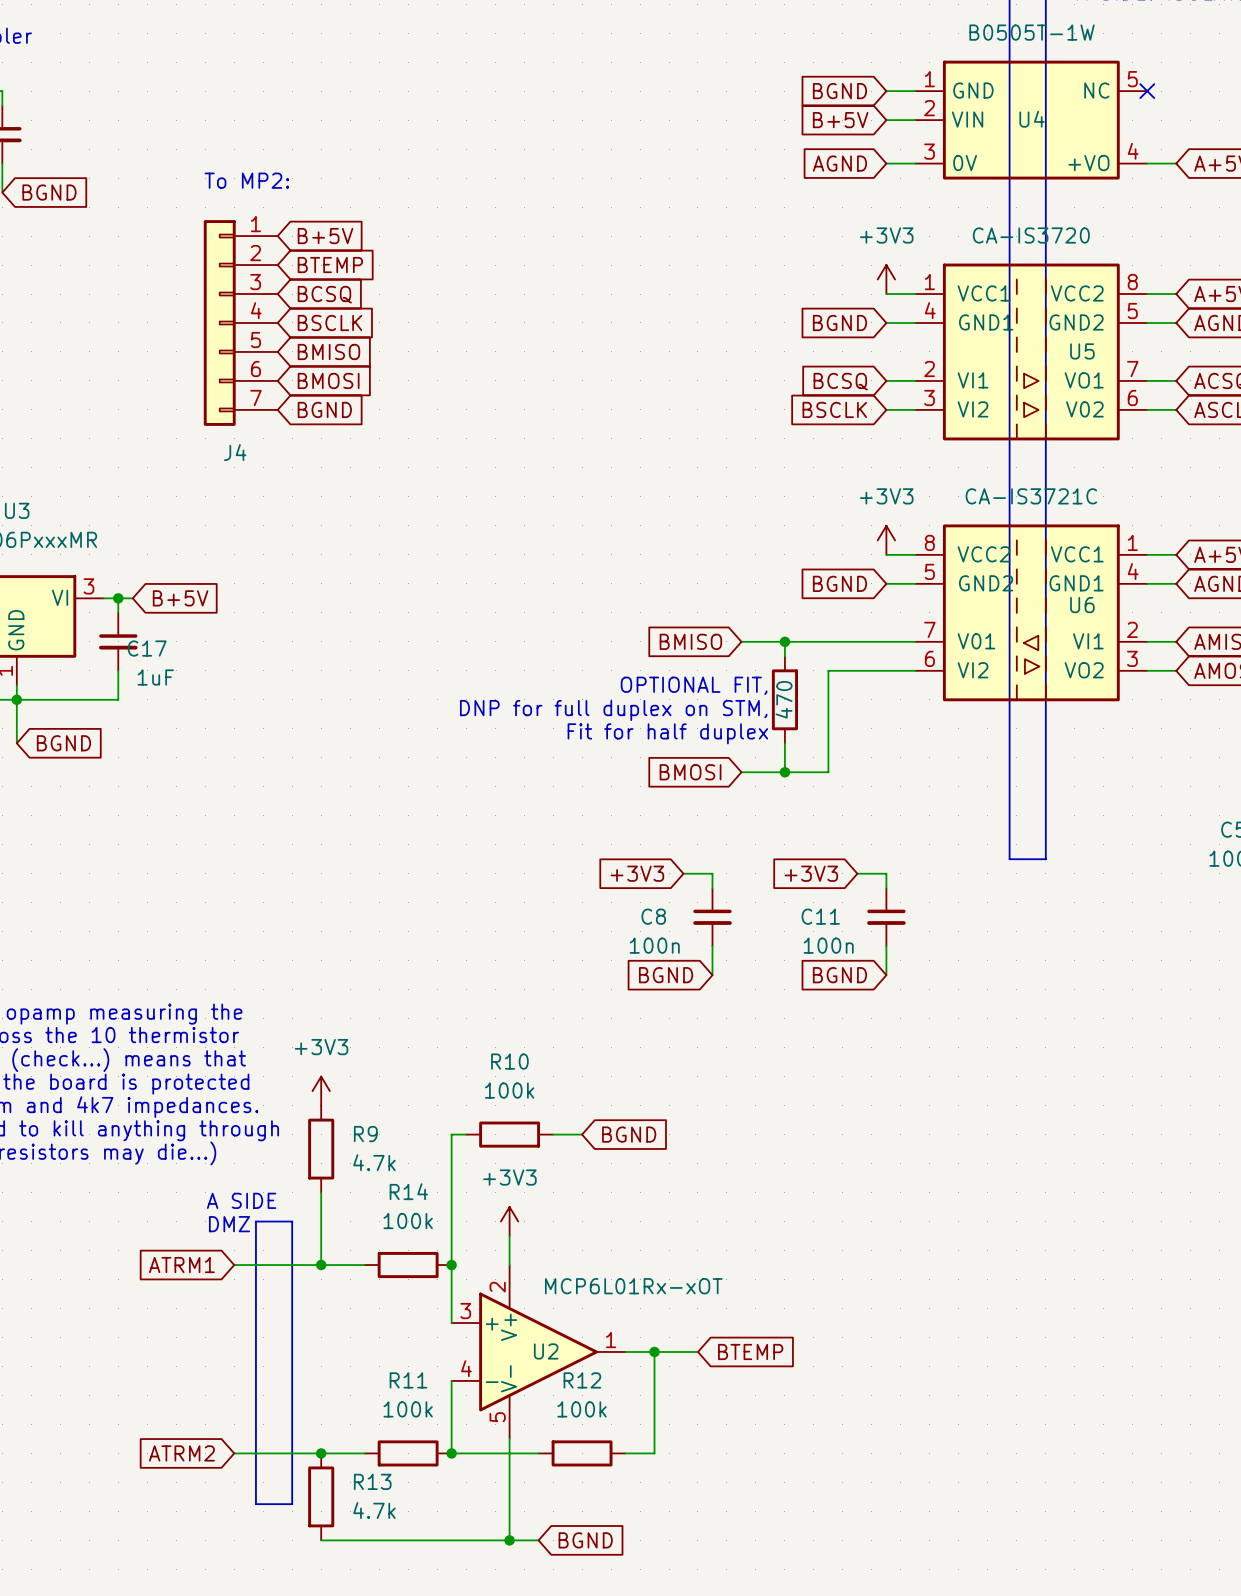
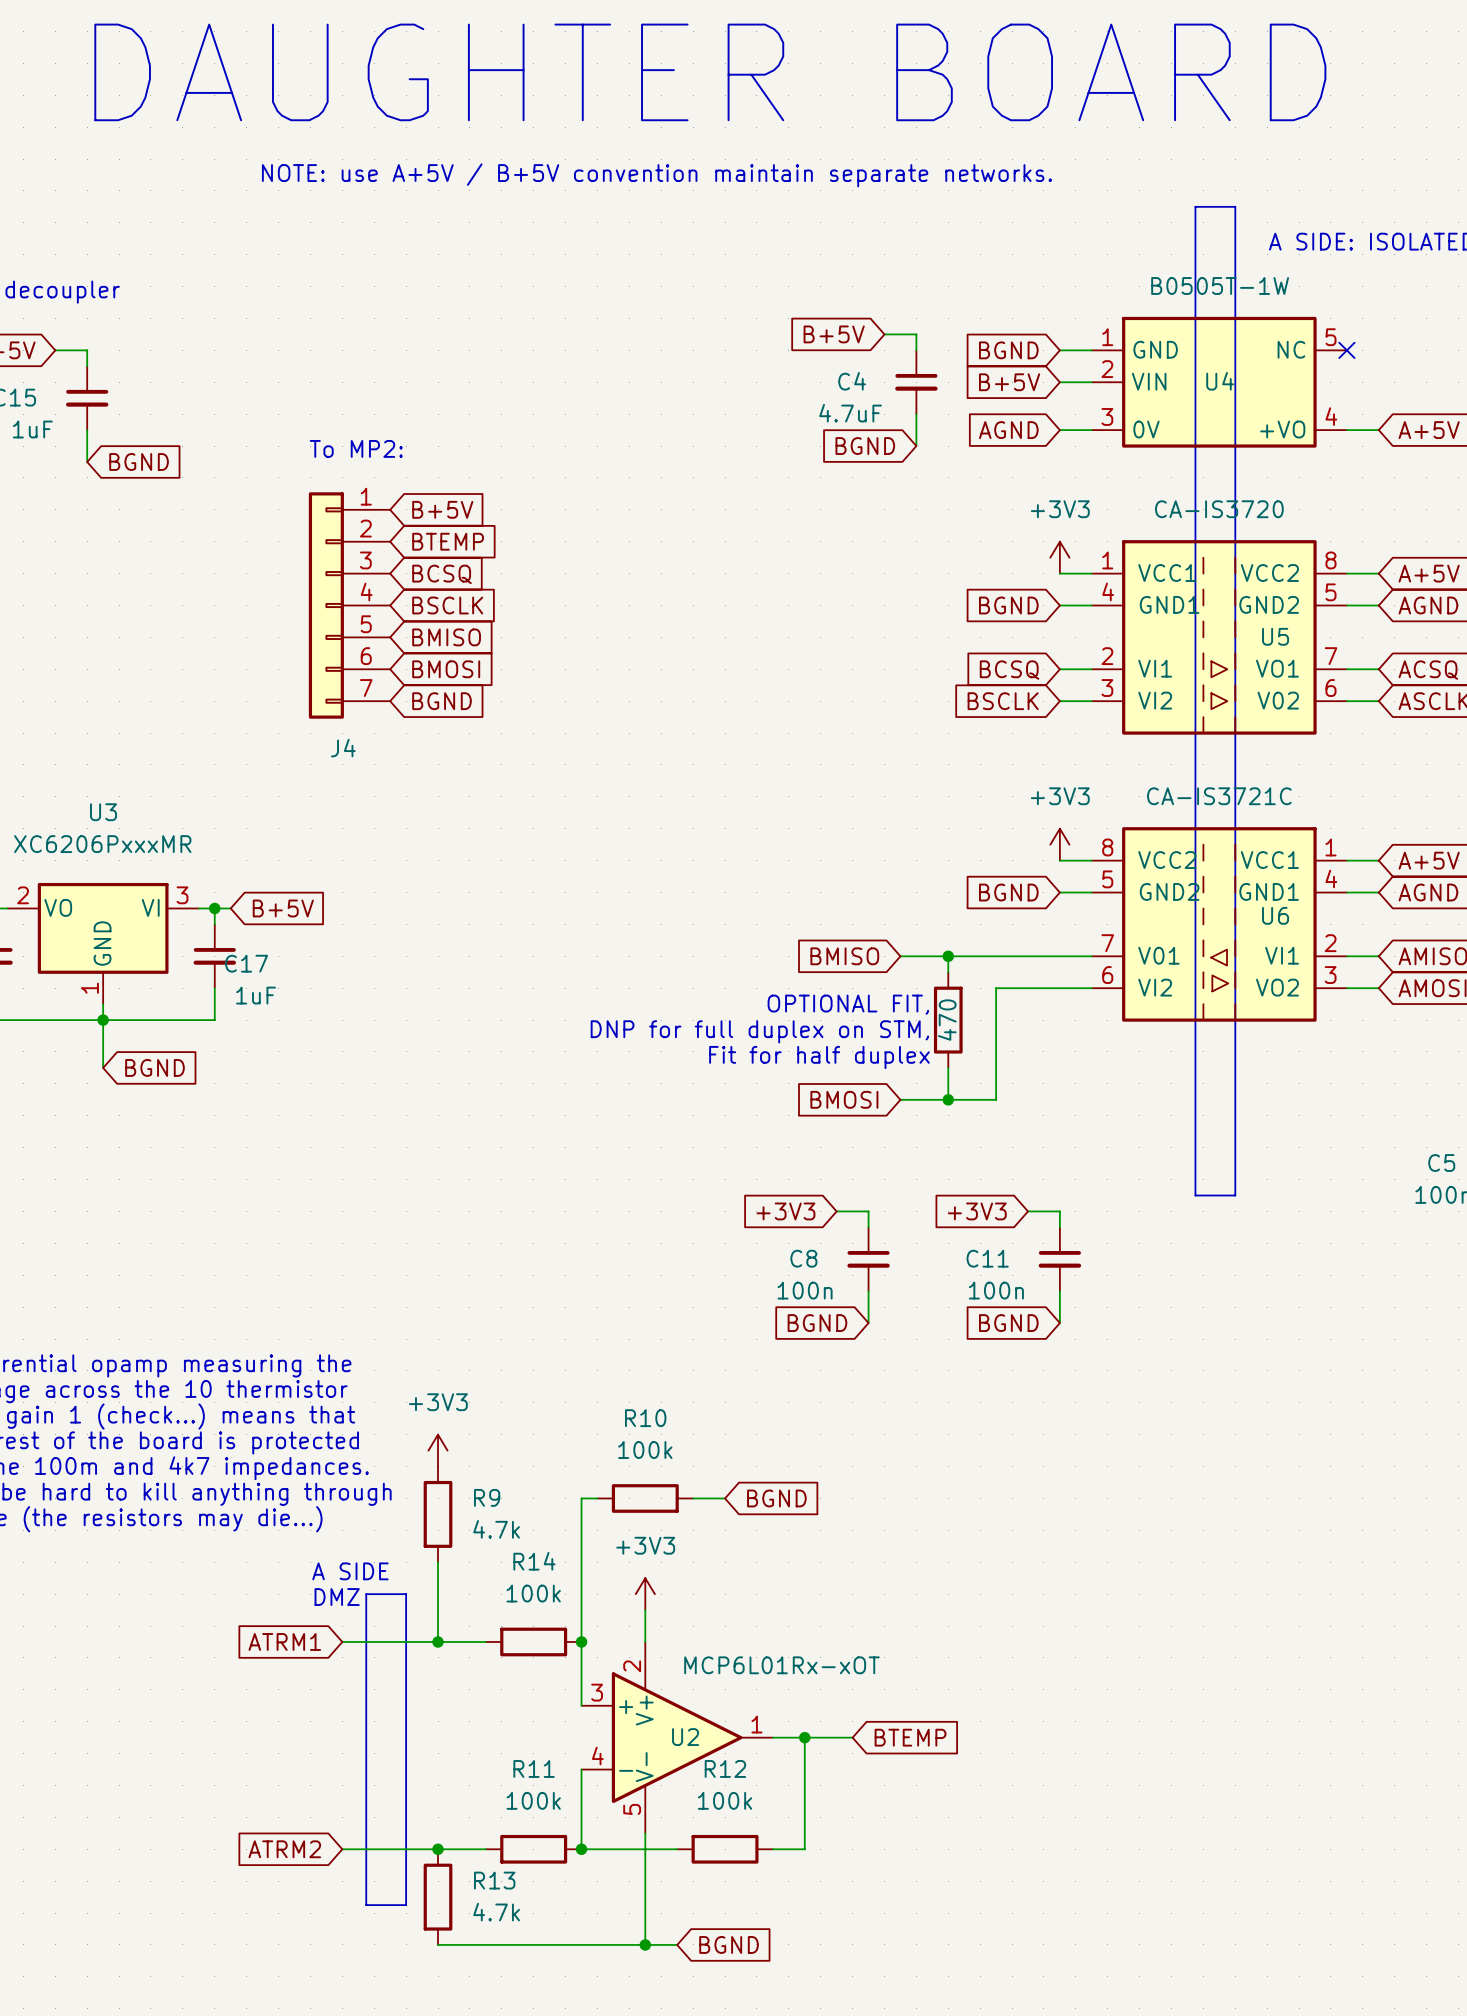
global label: none -> B+5V (834, 334)
wire: none -> (884, 334) (916, 334) (916, 350)
C4: none -> 4.7uF (916, 382)
wire: none -> (916, 414) (916, 446)
global label: none -> BGND (865, 446)

